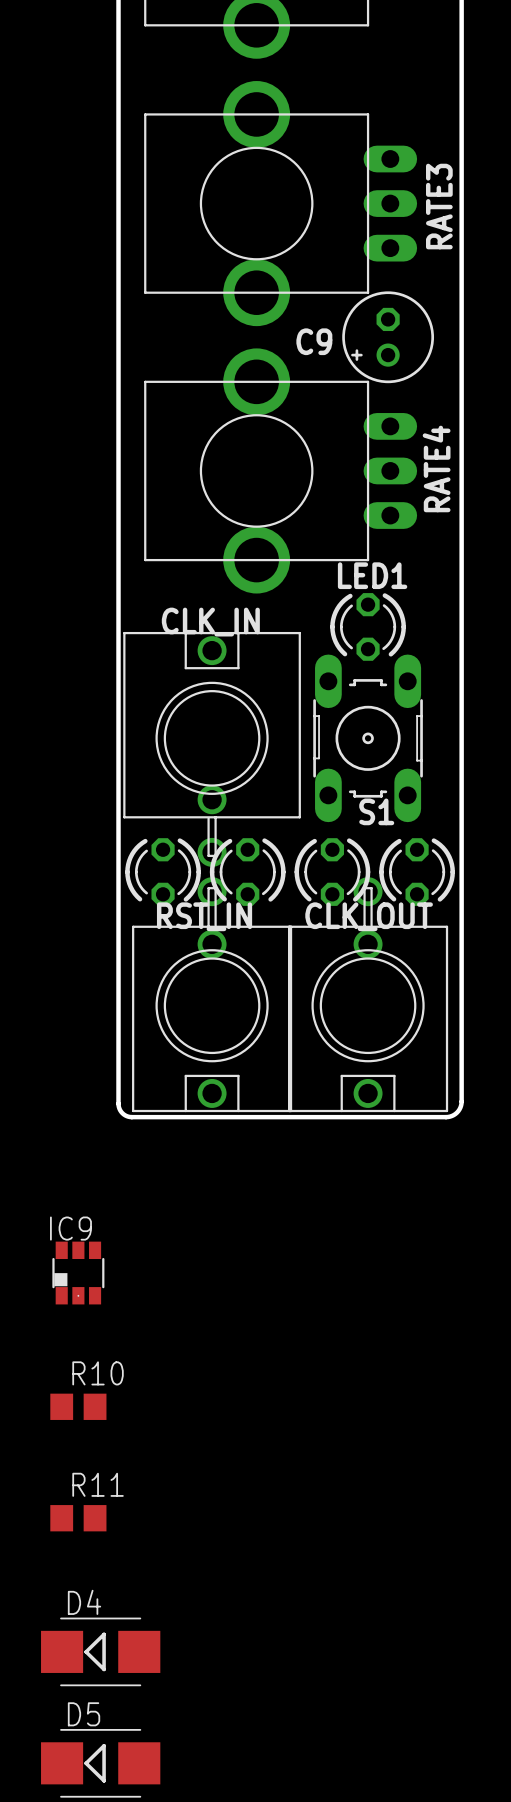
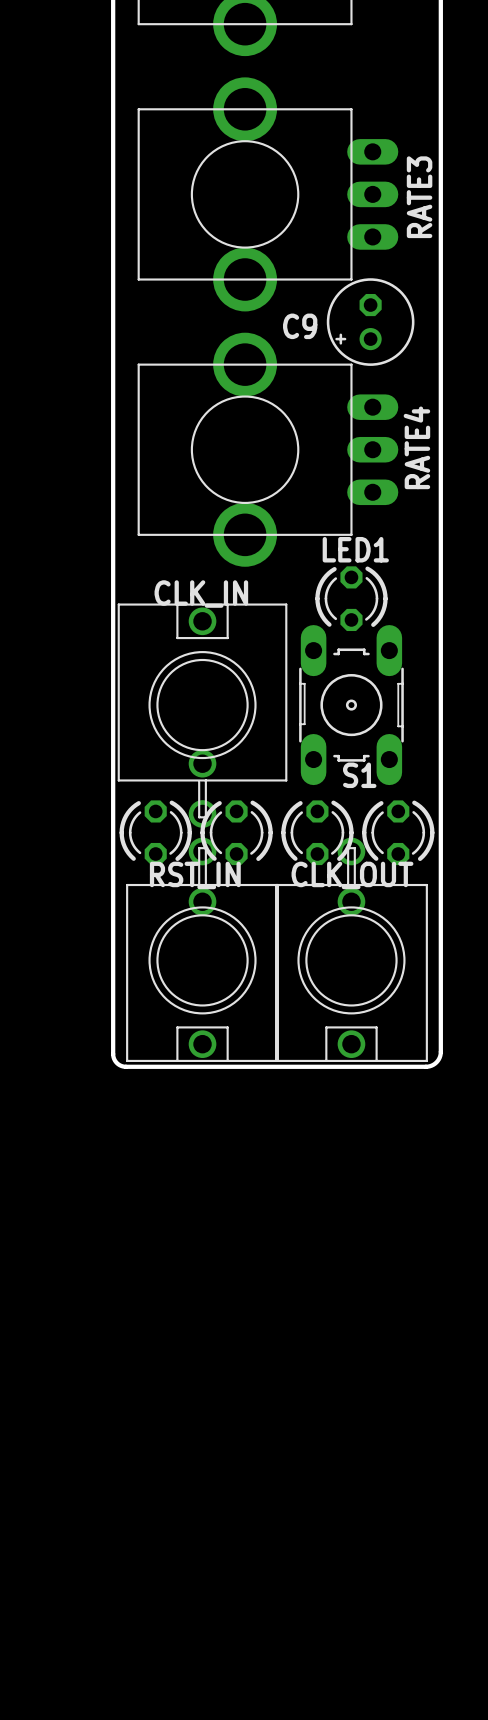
IC9: (78, 1273) -> none
R10: (78, 1406) -> none
R11: (78, 1518) -> none
D4: (100, 1651) -> none
D5: (100, 1763) -> none

